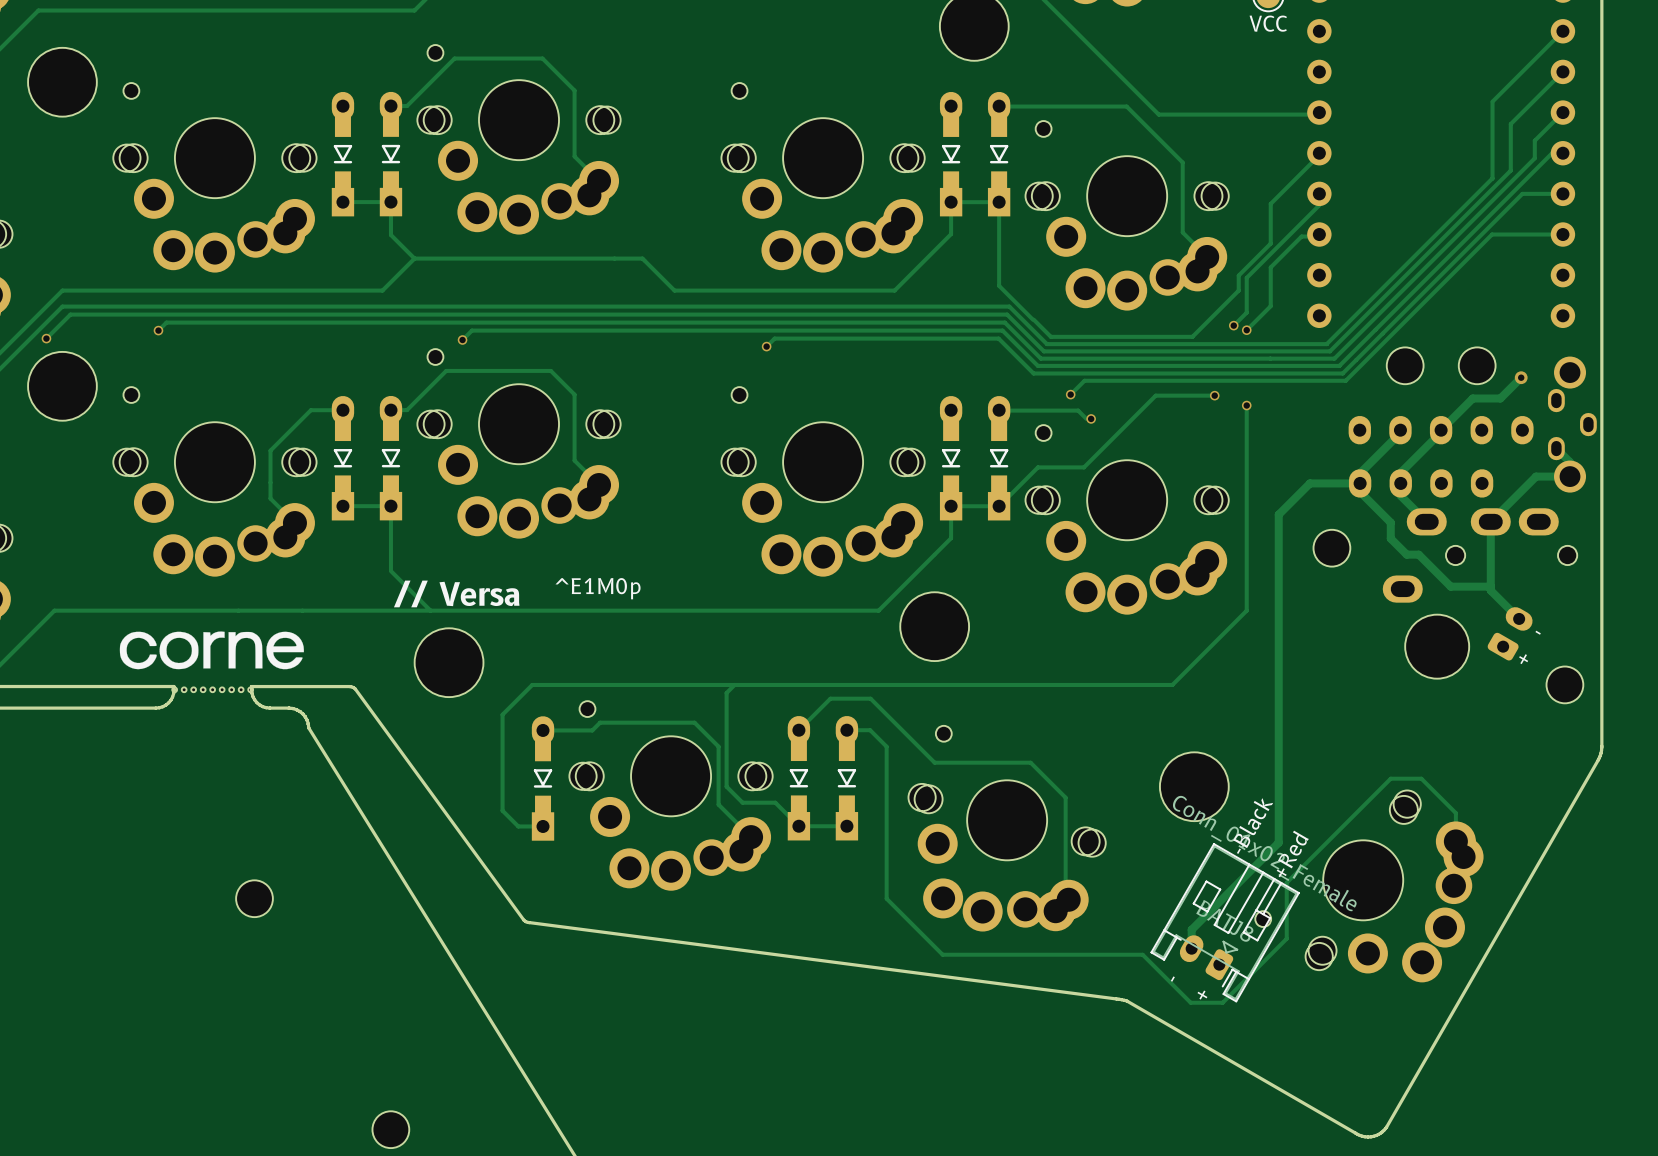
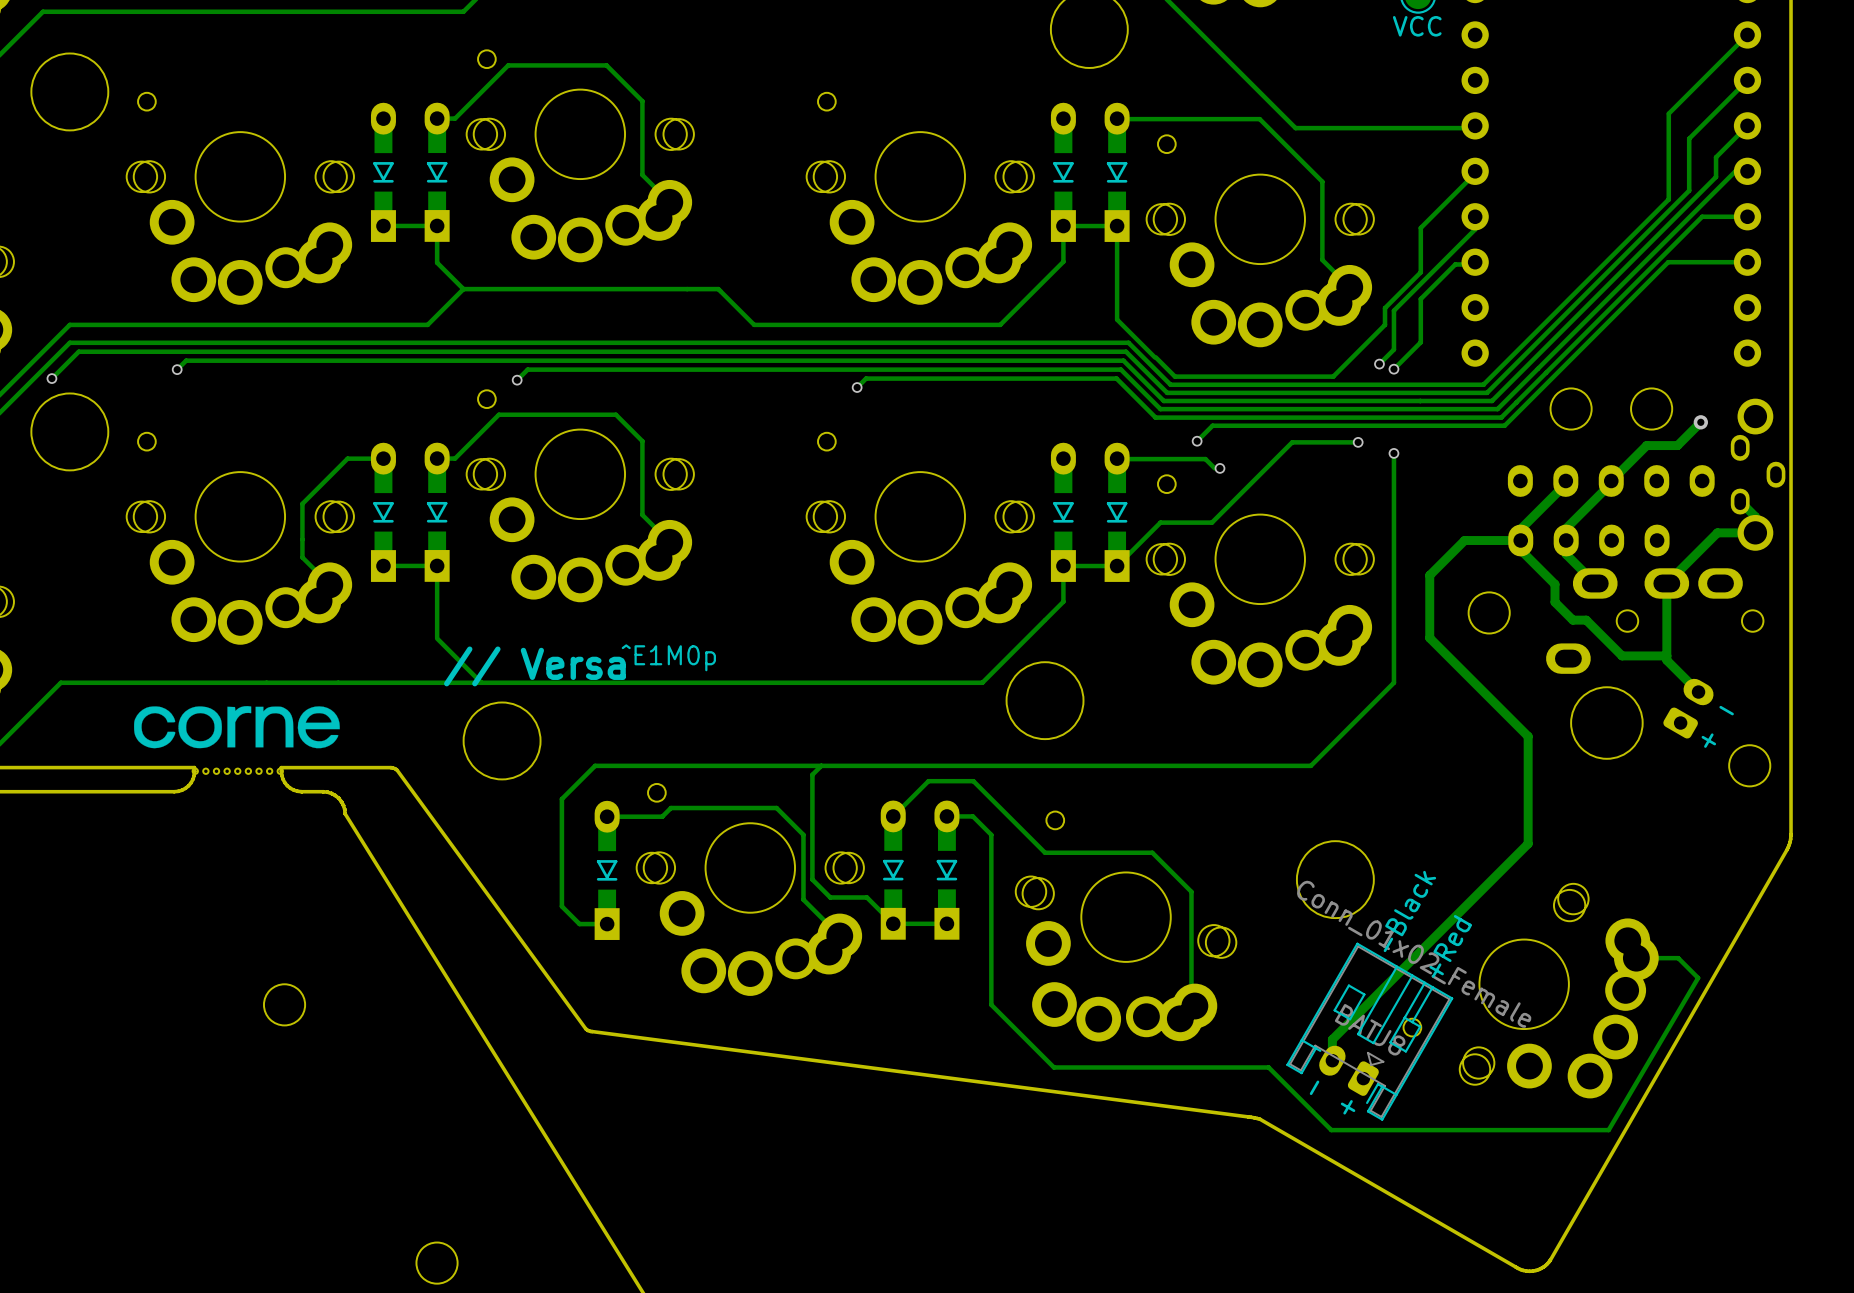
track: (1278, 570) (1278, 842) -> (1429, 638) (1528, 736) (1528, 843) (1429, 942)
track: (1455, 841) (1455, 813) (1421, 778) (1390, 778) (1286, 882) (1286, 938) (1222, 1002) (1190, 1002) (1142, 954) (1134, 954) -> (1636, 958) (1678, 958) (1698, 978) (1608, 1130) (1331, 1130) (1268, 1067)

